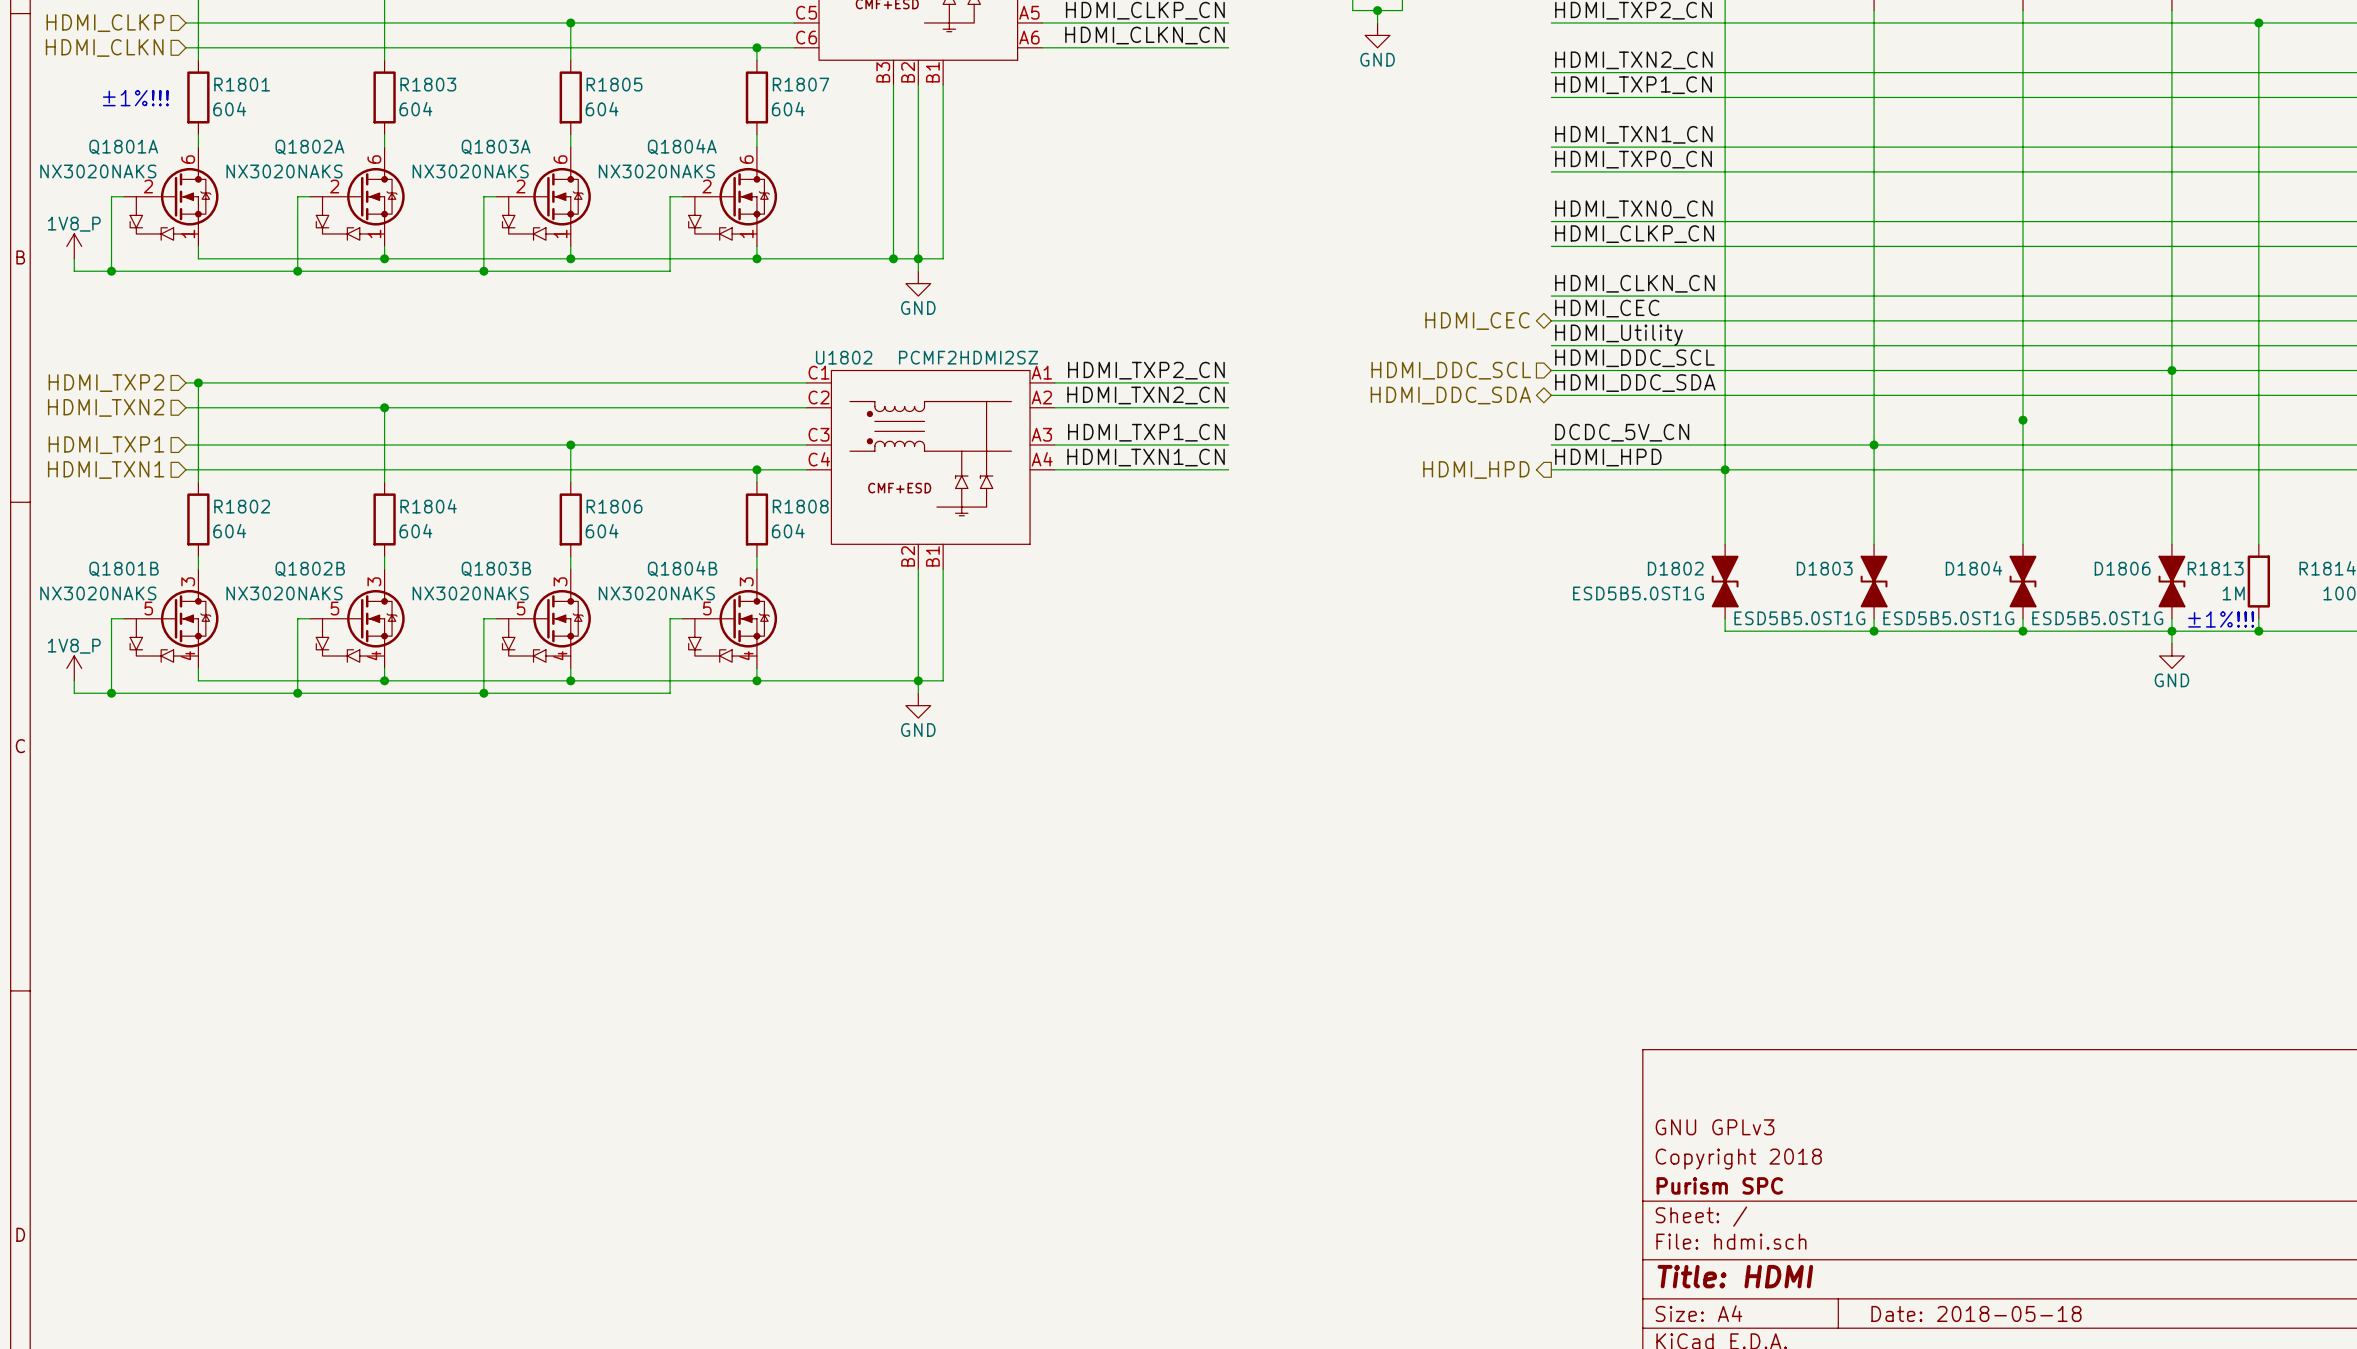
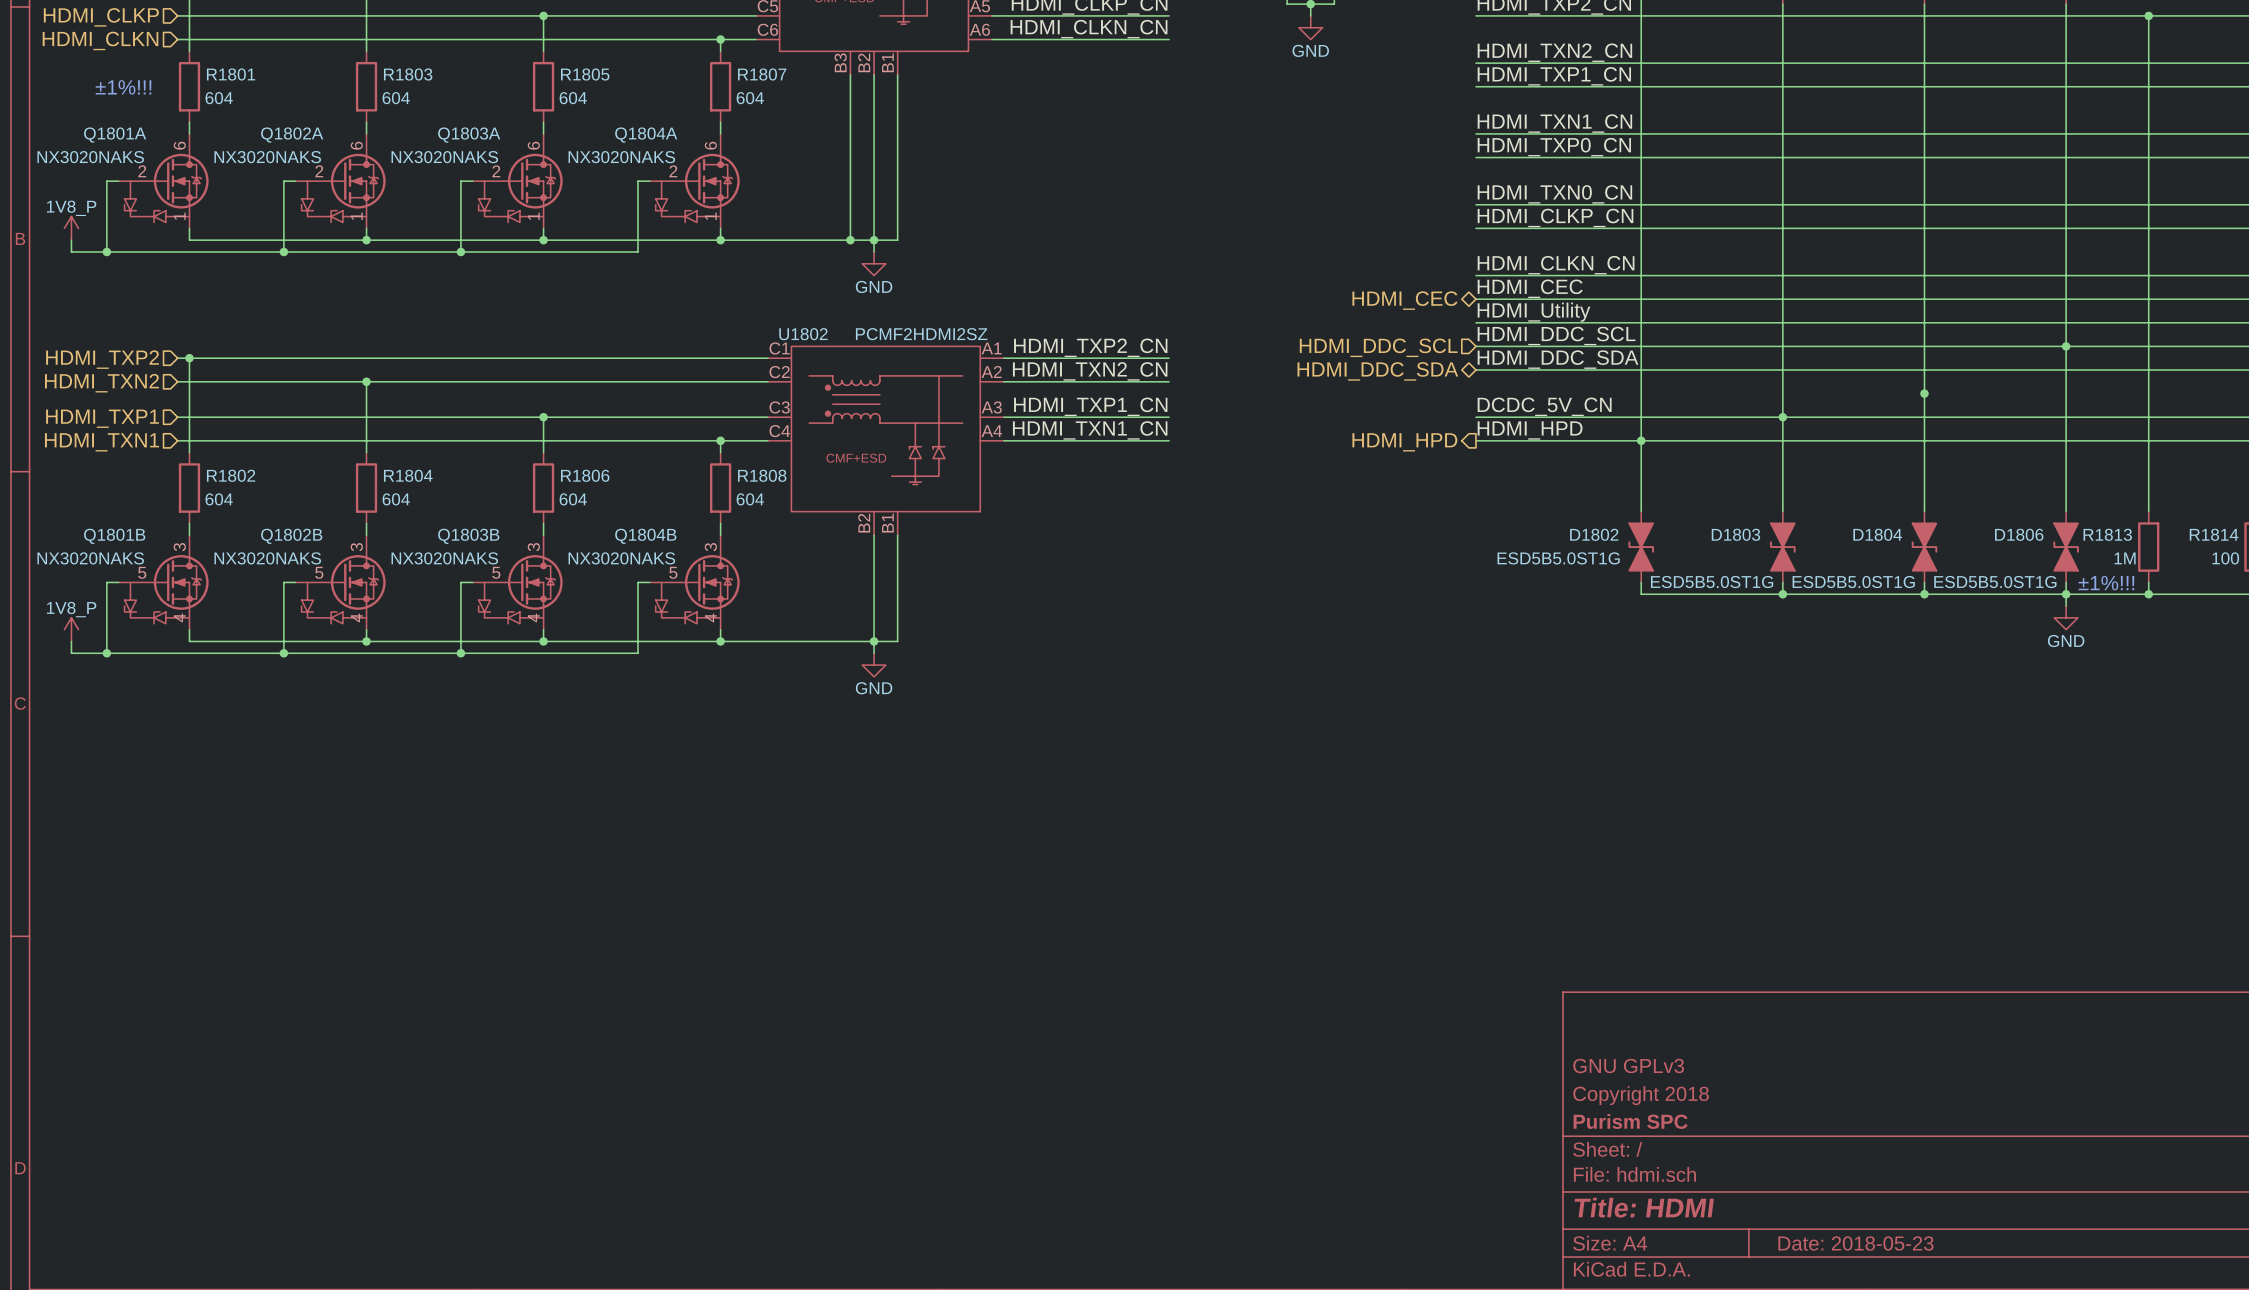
title block: Date: 2018-05-18 (1976, 1313) -> Date: 2018-05-23 (1855, 1243)

